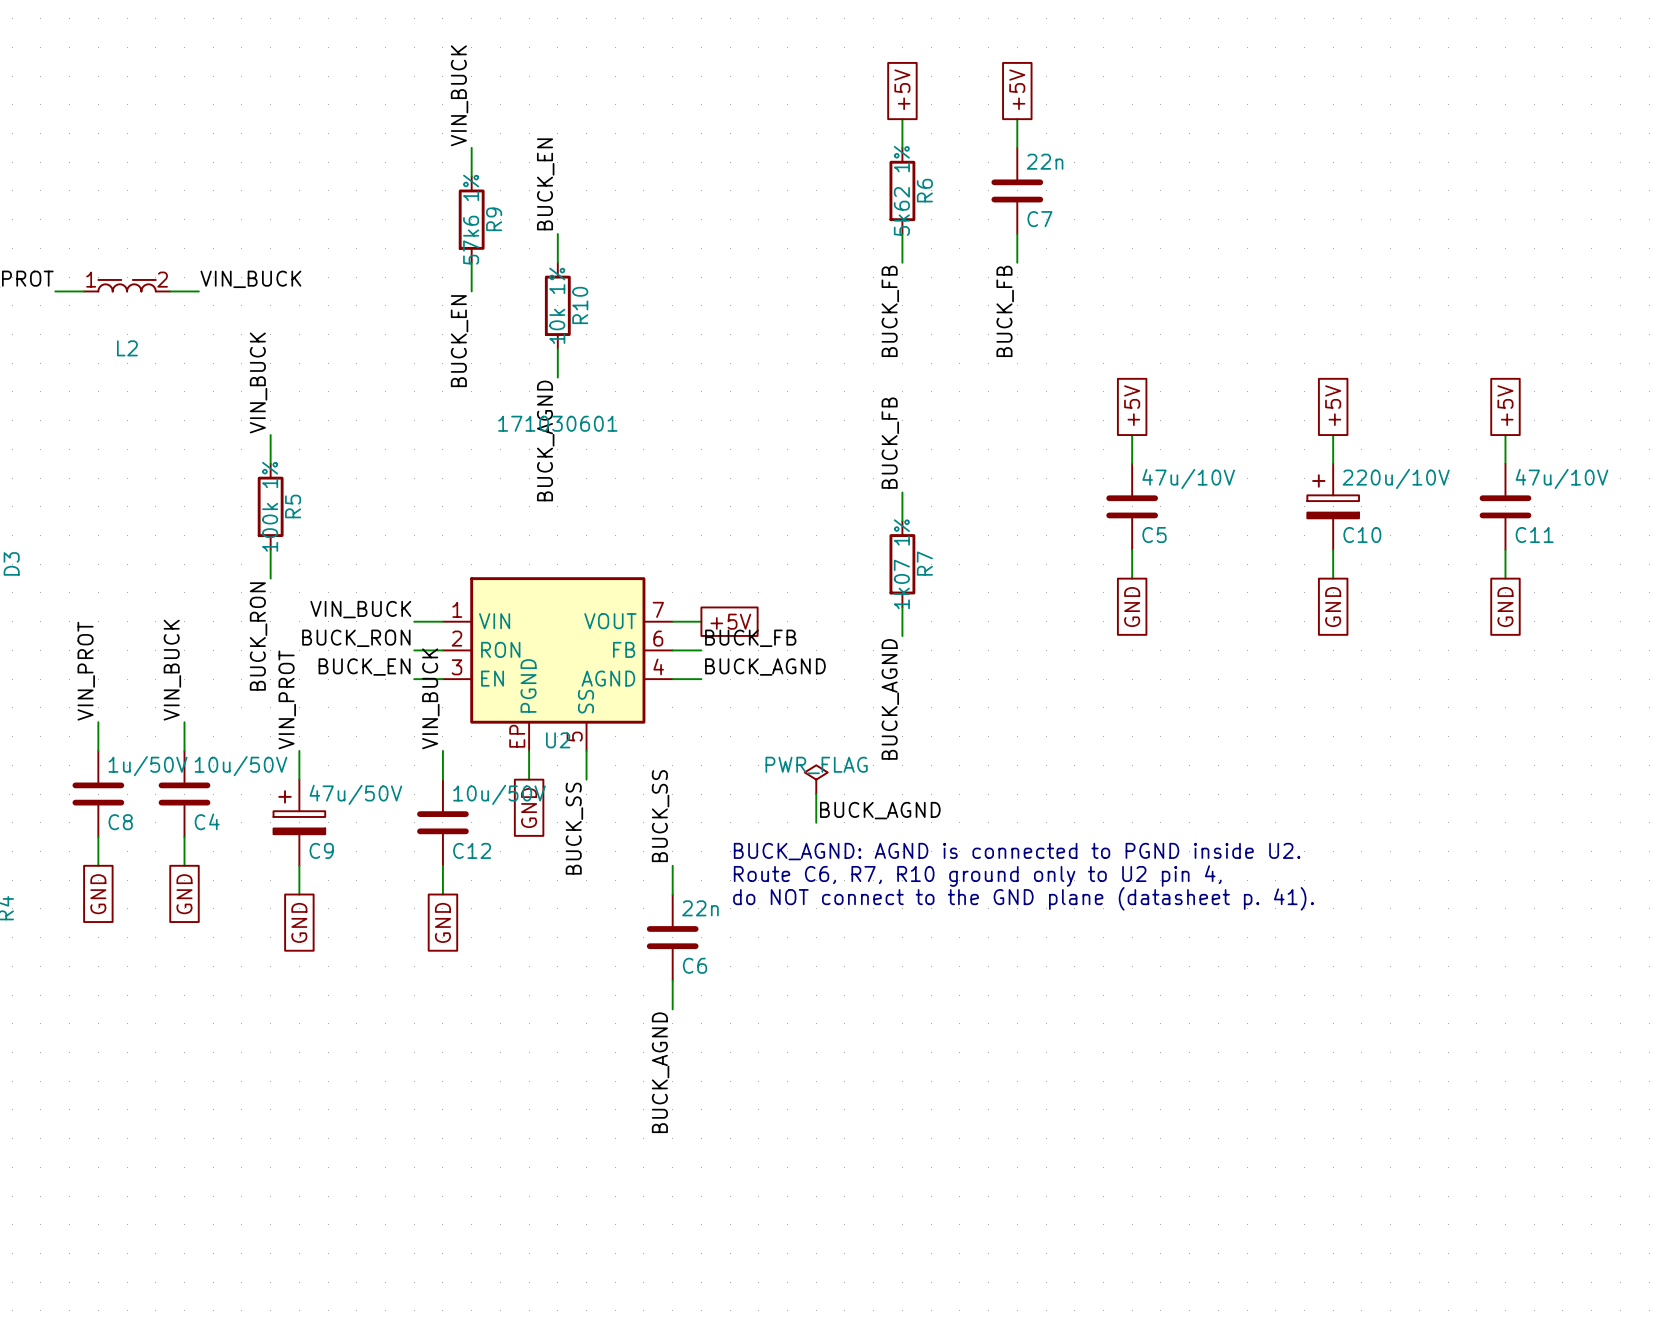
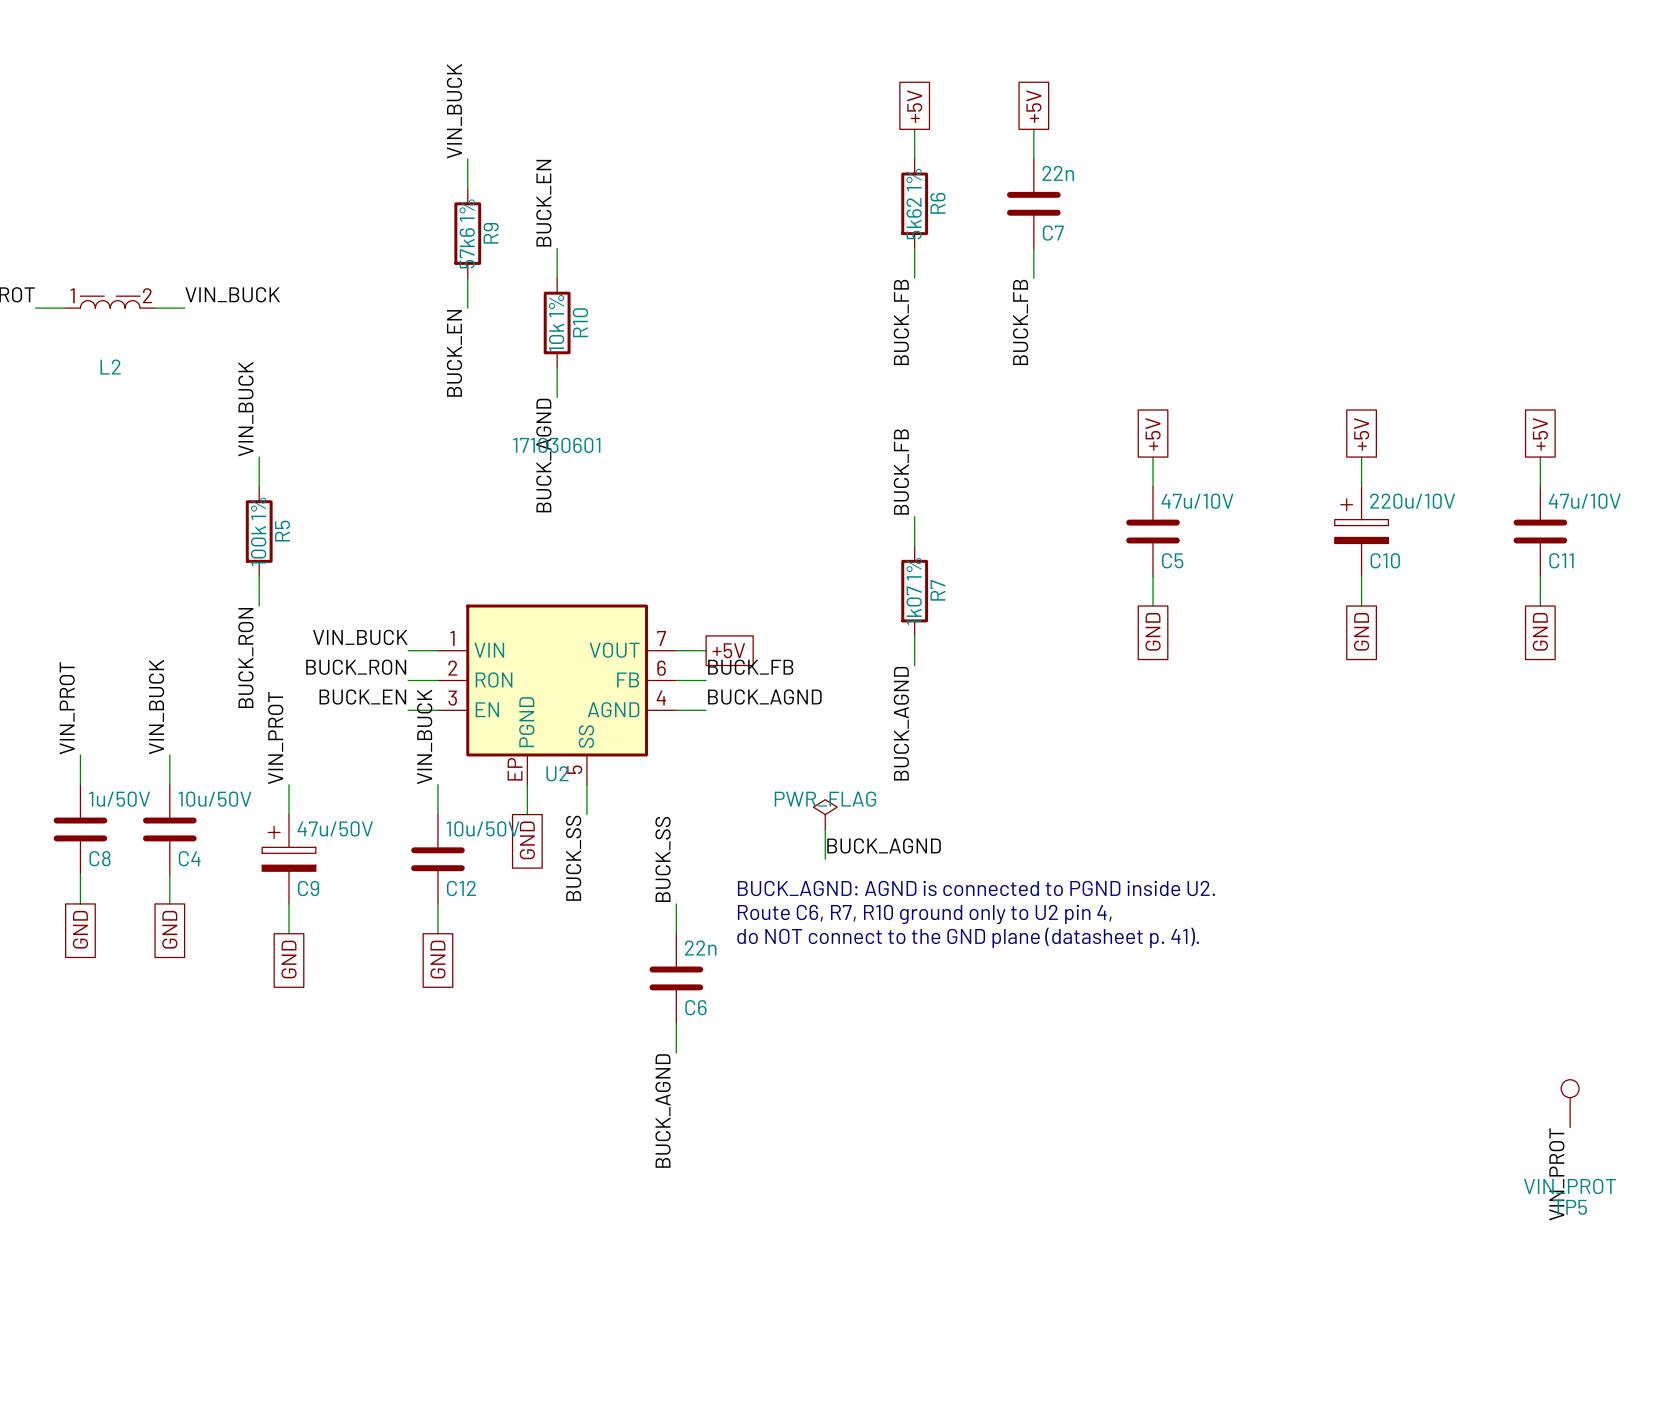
TP5: none -> VIN_PROT (1570, 1103)
label: none -> VIN_PROT (1556, 1174)

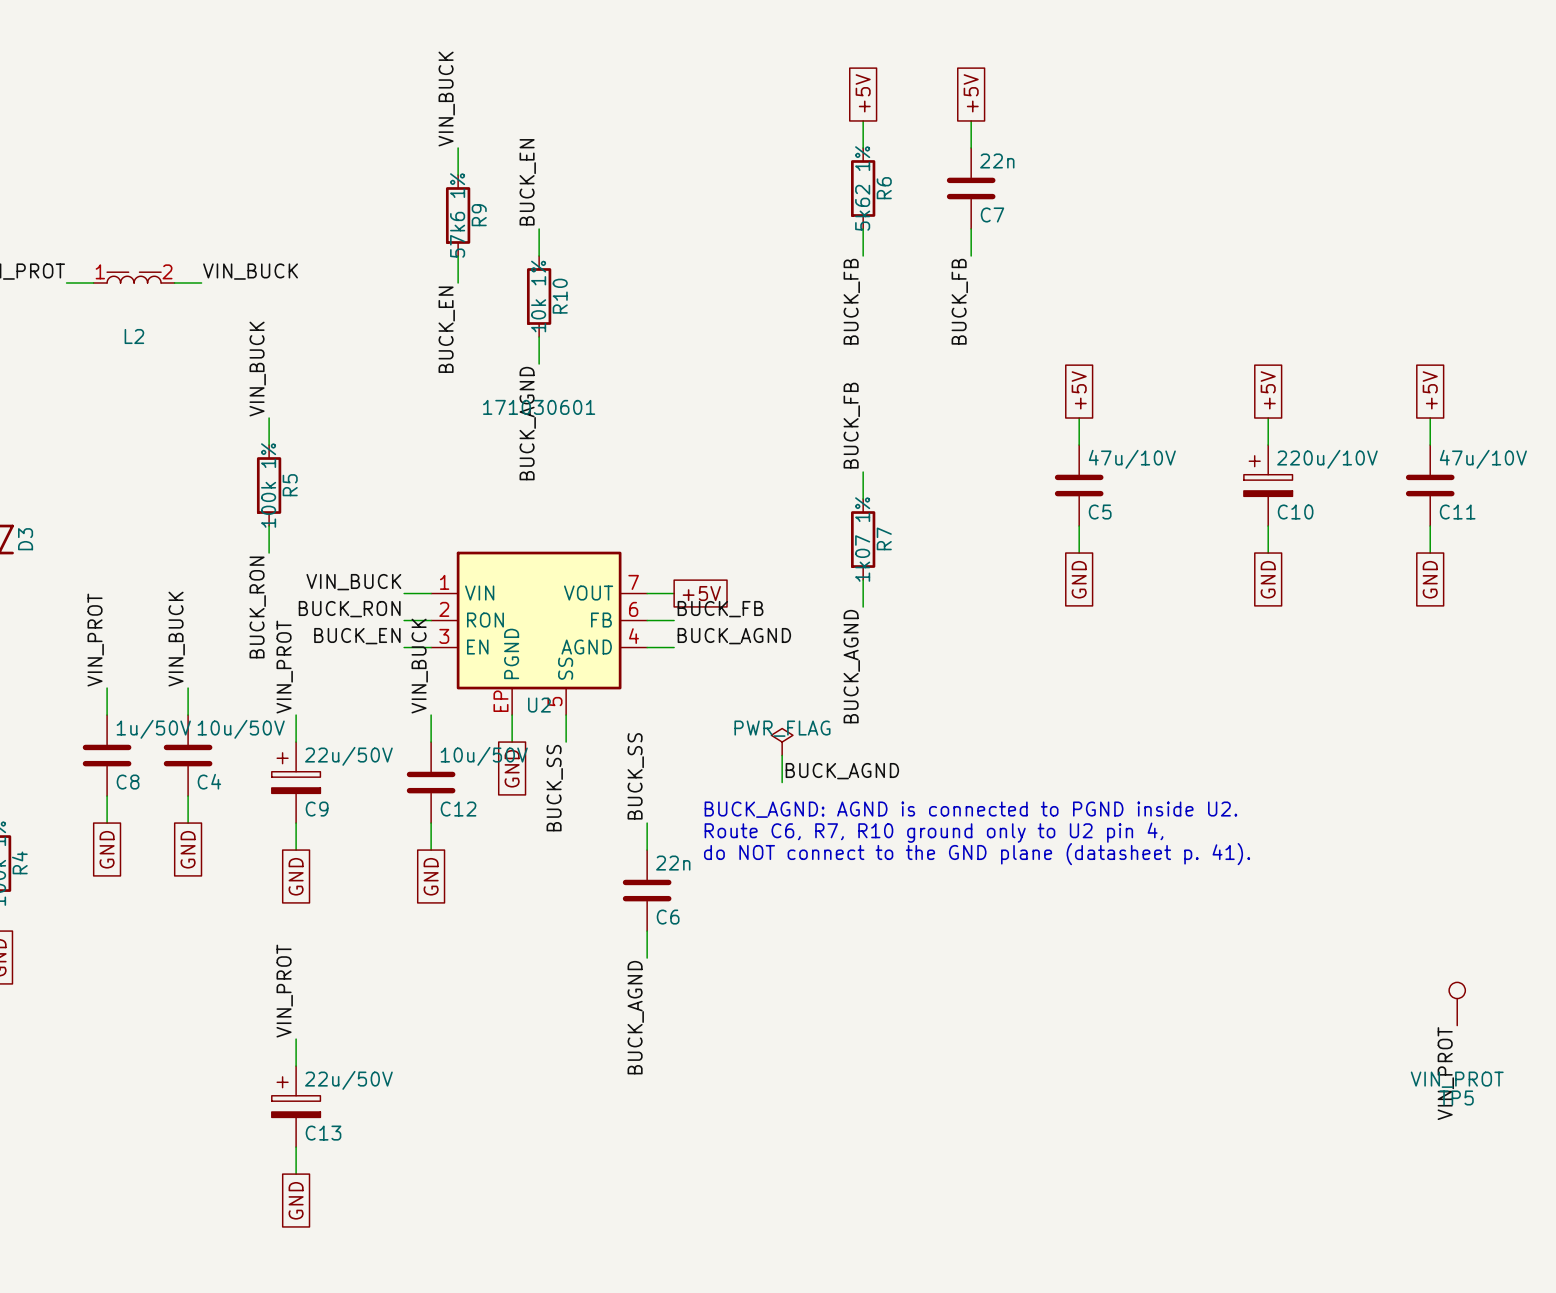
C9 value: 47u/50V (335, 828) -> 22u/50V (348, 756)
label: none -> VIN_PROT (284, 991)
wire: none -> (296, 1039) (296, 1066)
C13: none -> 22u/50V (296, 1106)
wire: none -> (296, 1147) (296, 1174)
global label: none -> GND (296, 1200)

